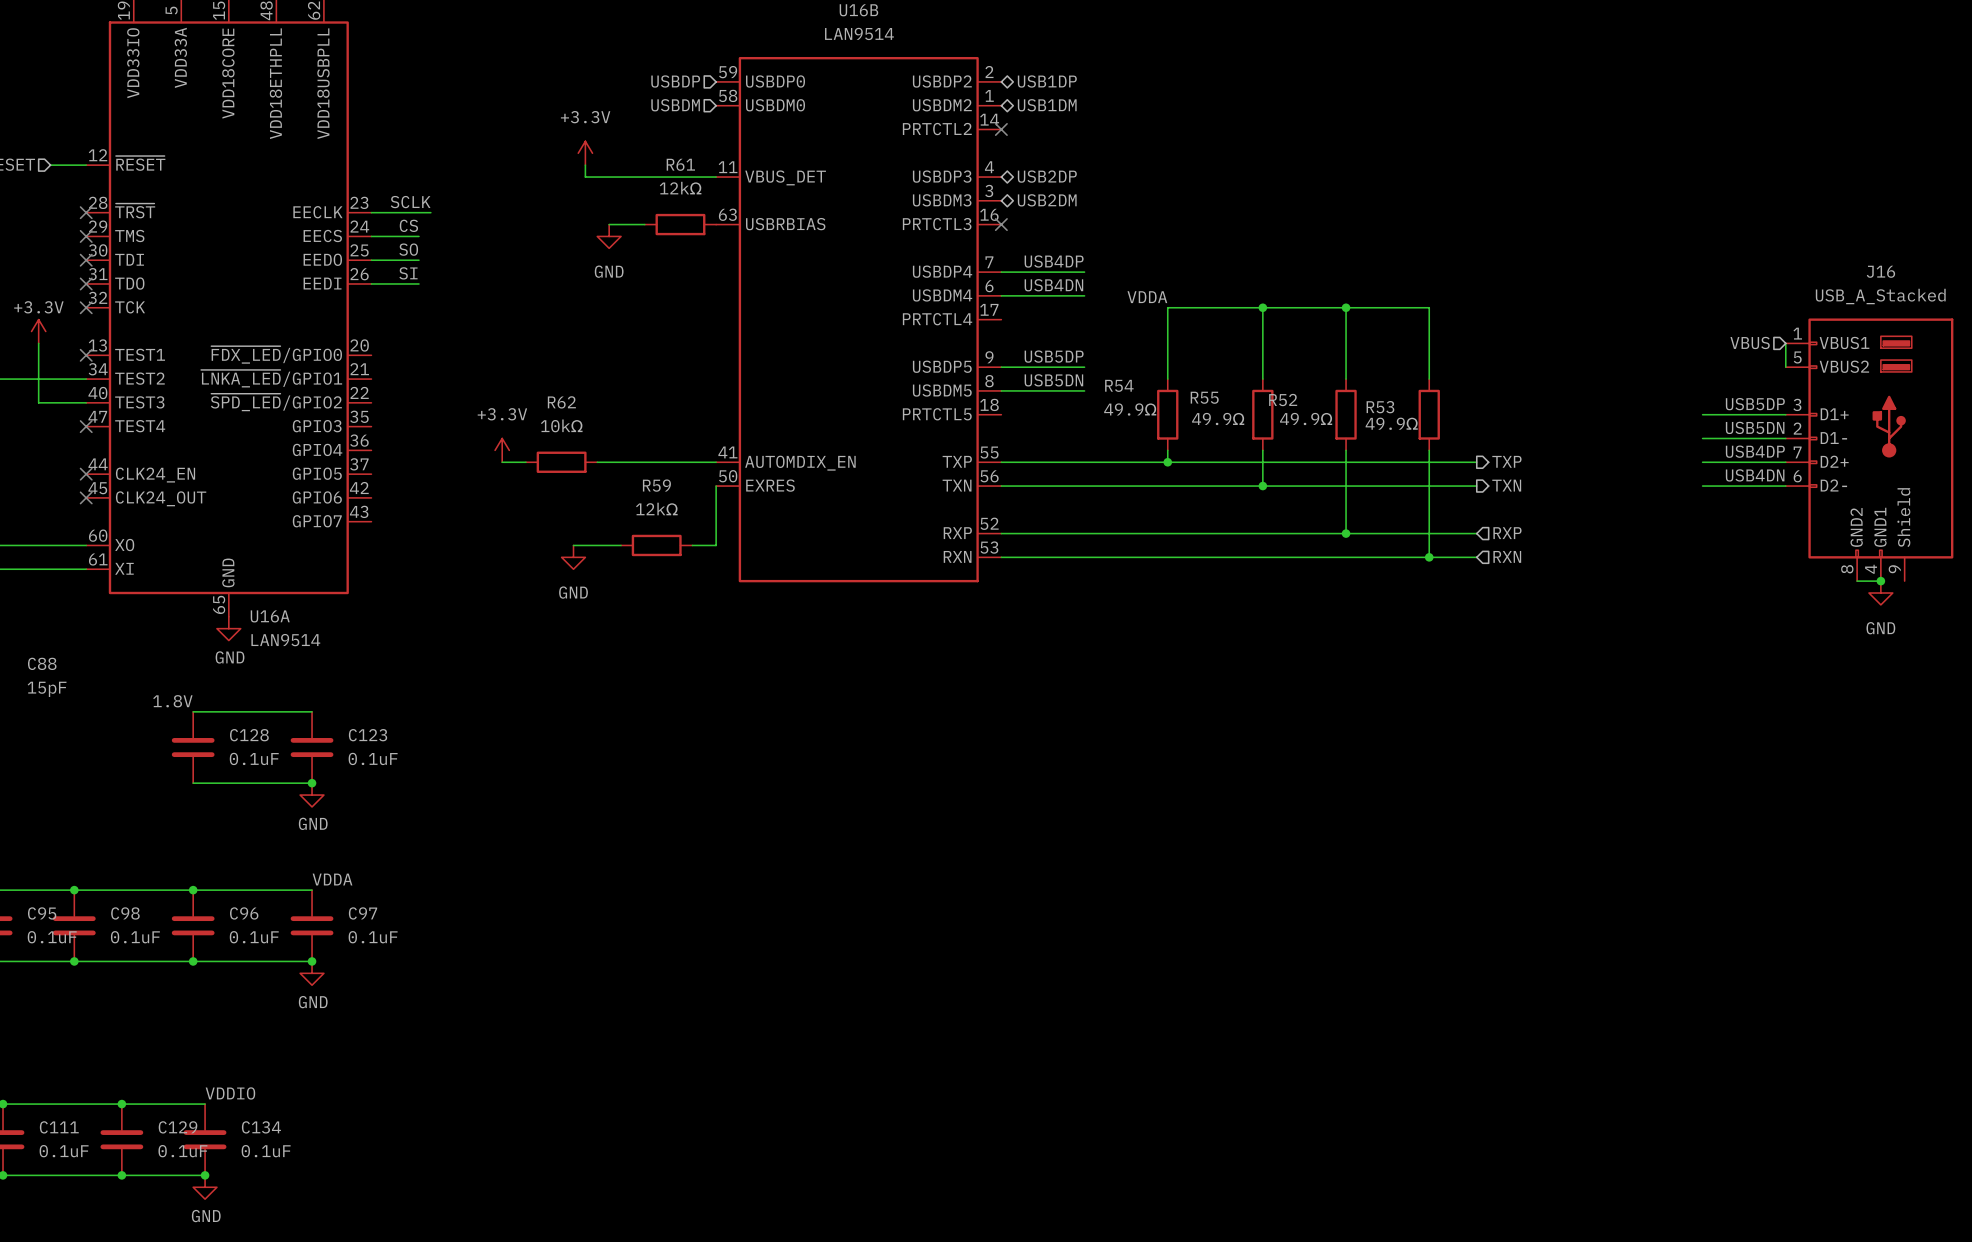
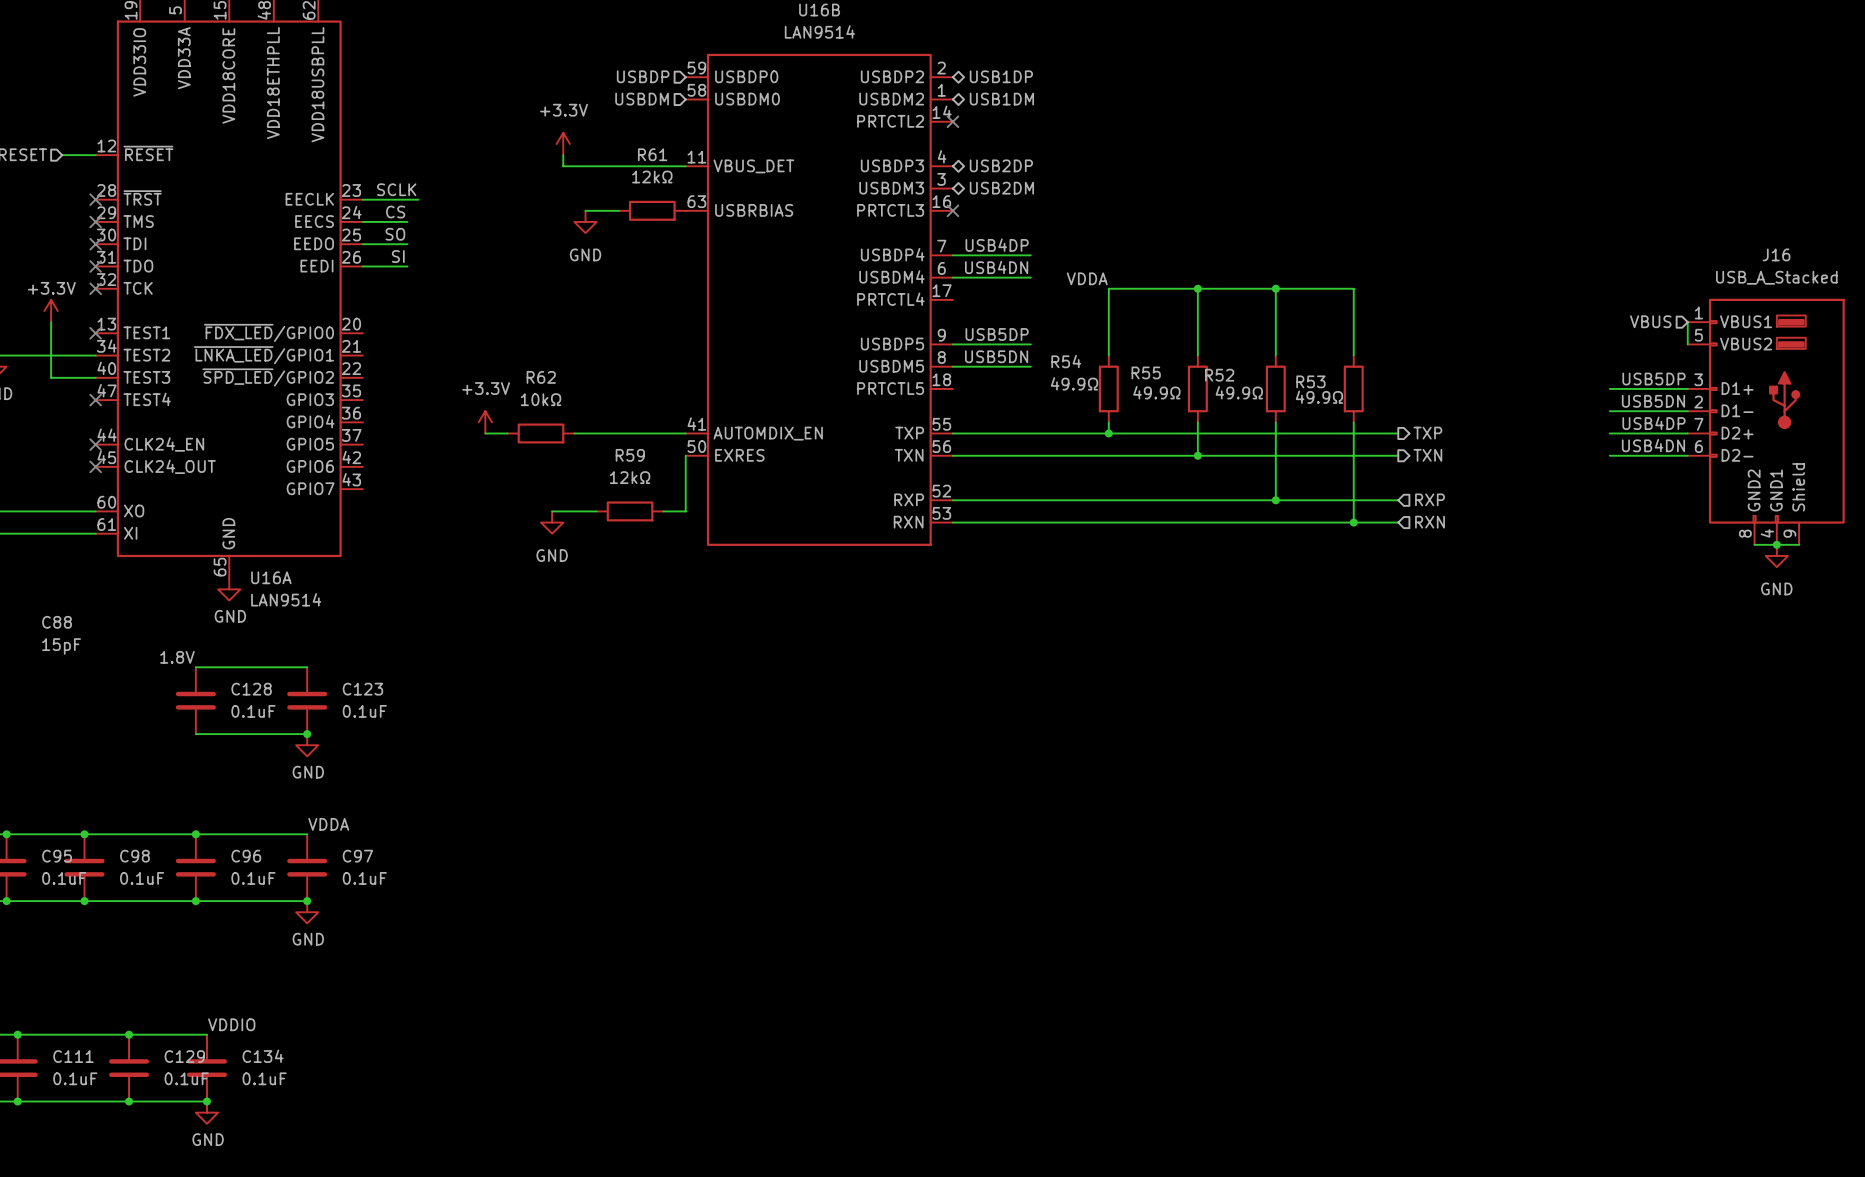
wire: none -> (1776, 544) (1799, 544)

